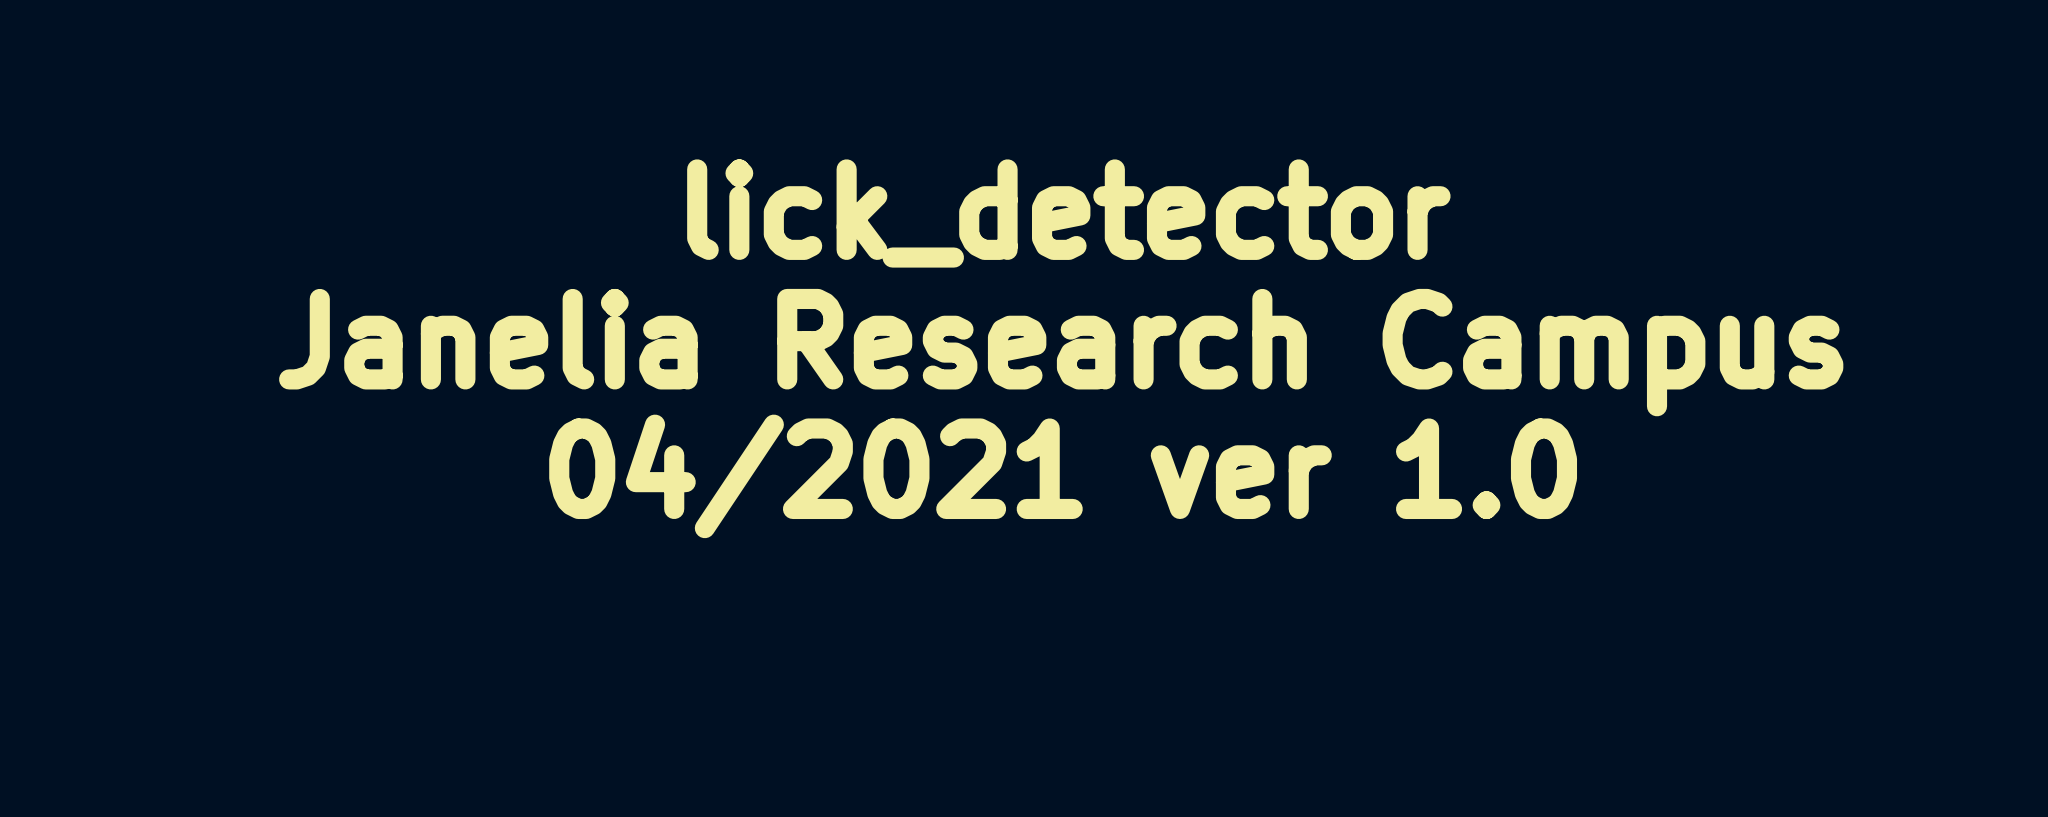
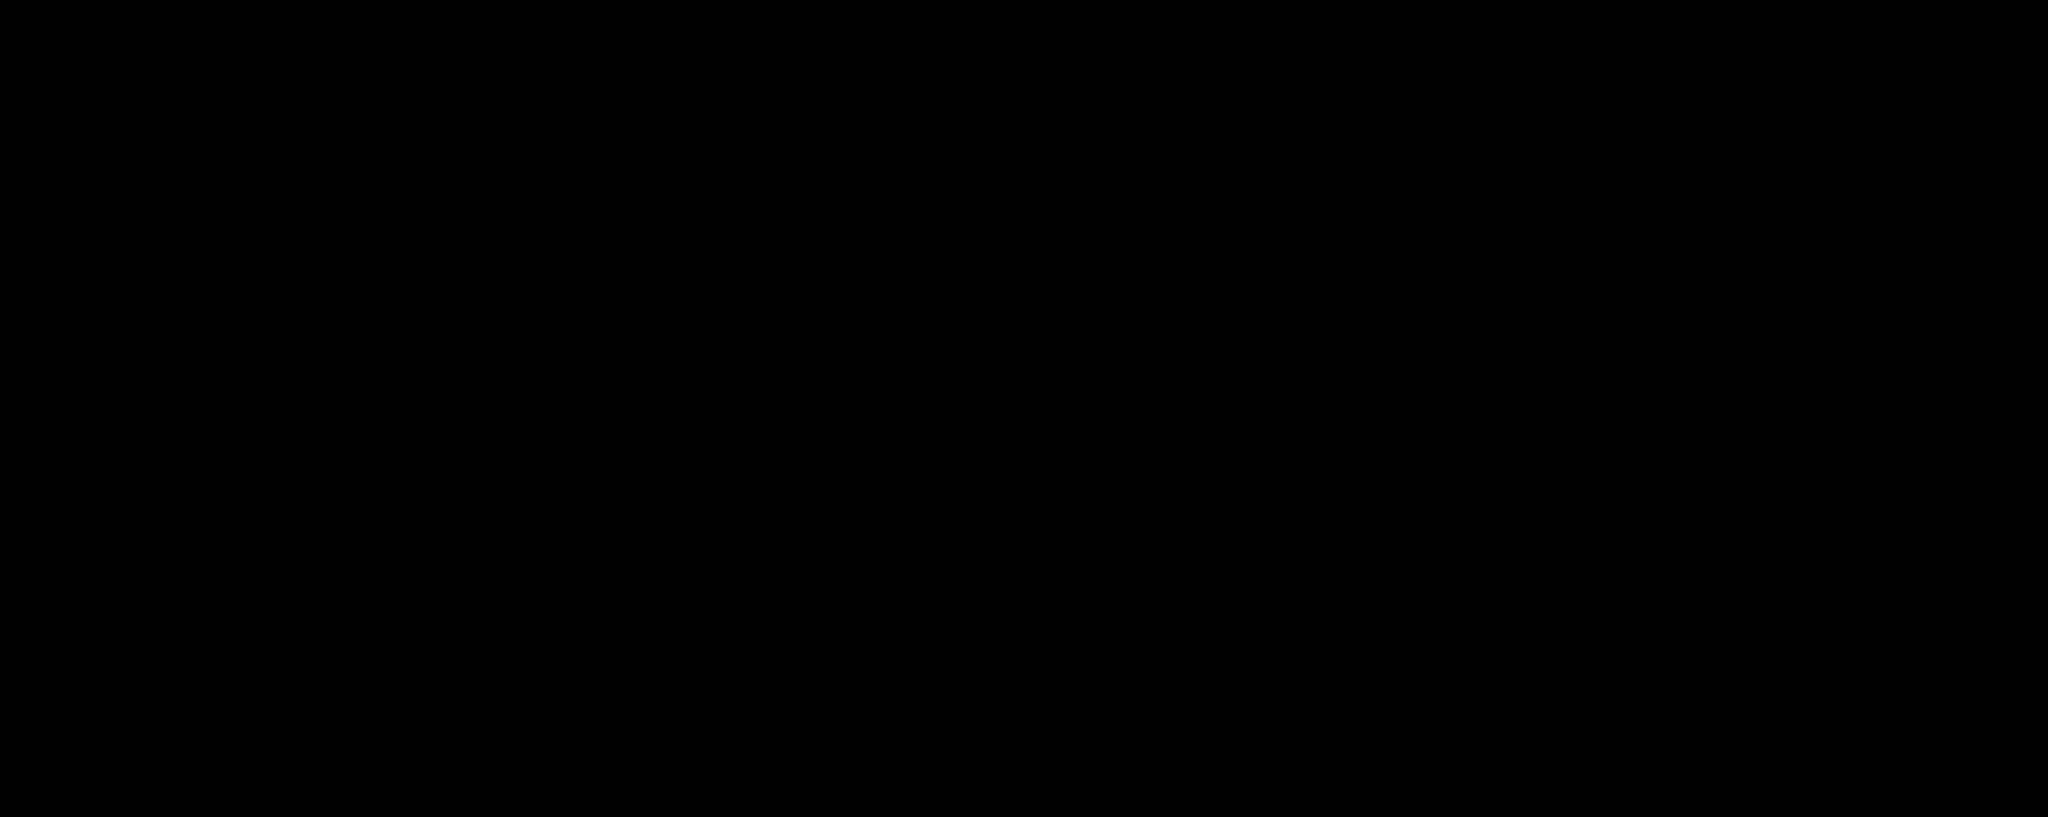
text: lick_detector (1068, 213) -> none
text: Janelia Research Campus (1061, 352) -> none
text: 04/2021 ver 1.0 (1063, 476) -> none

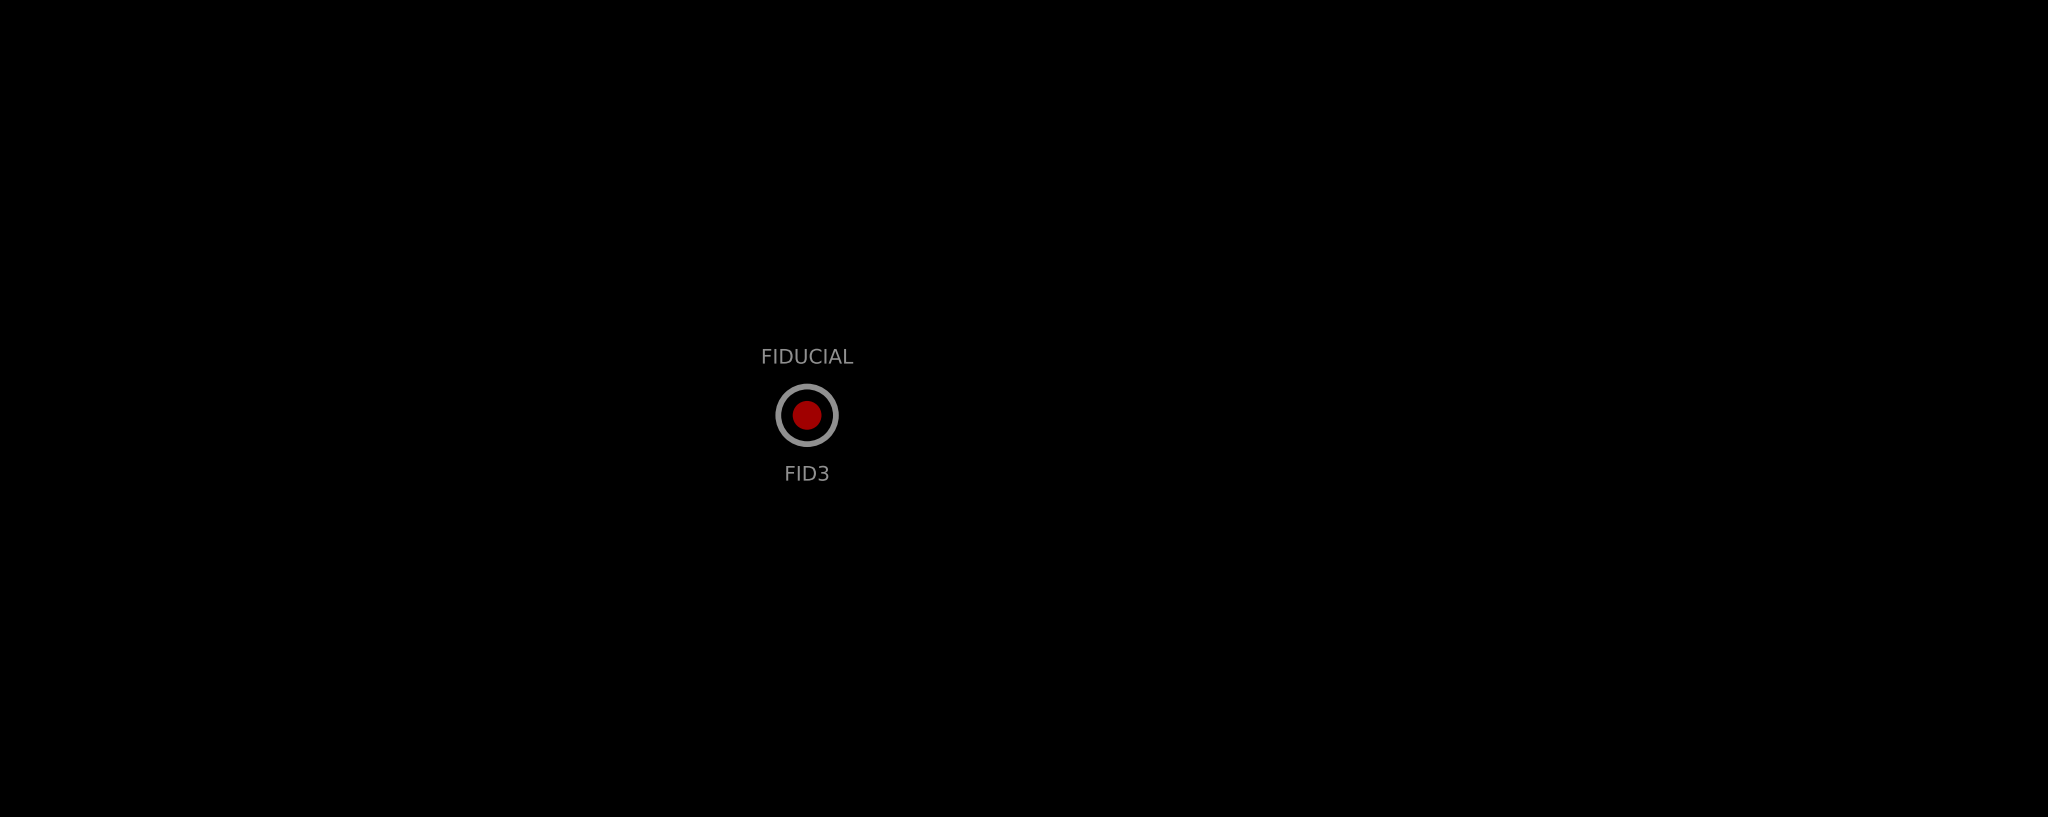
FID3: none -> FIDUCIAL (807, 415)

